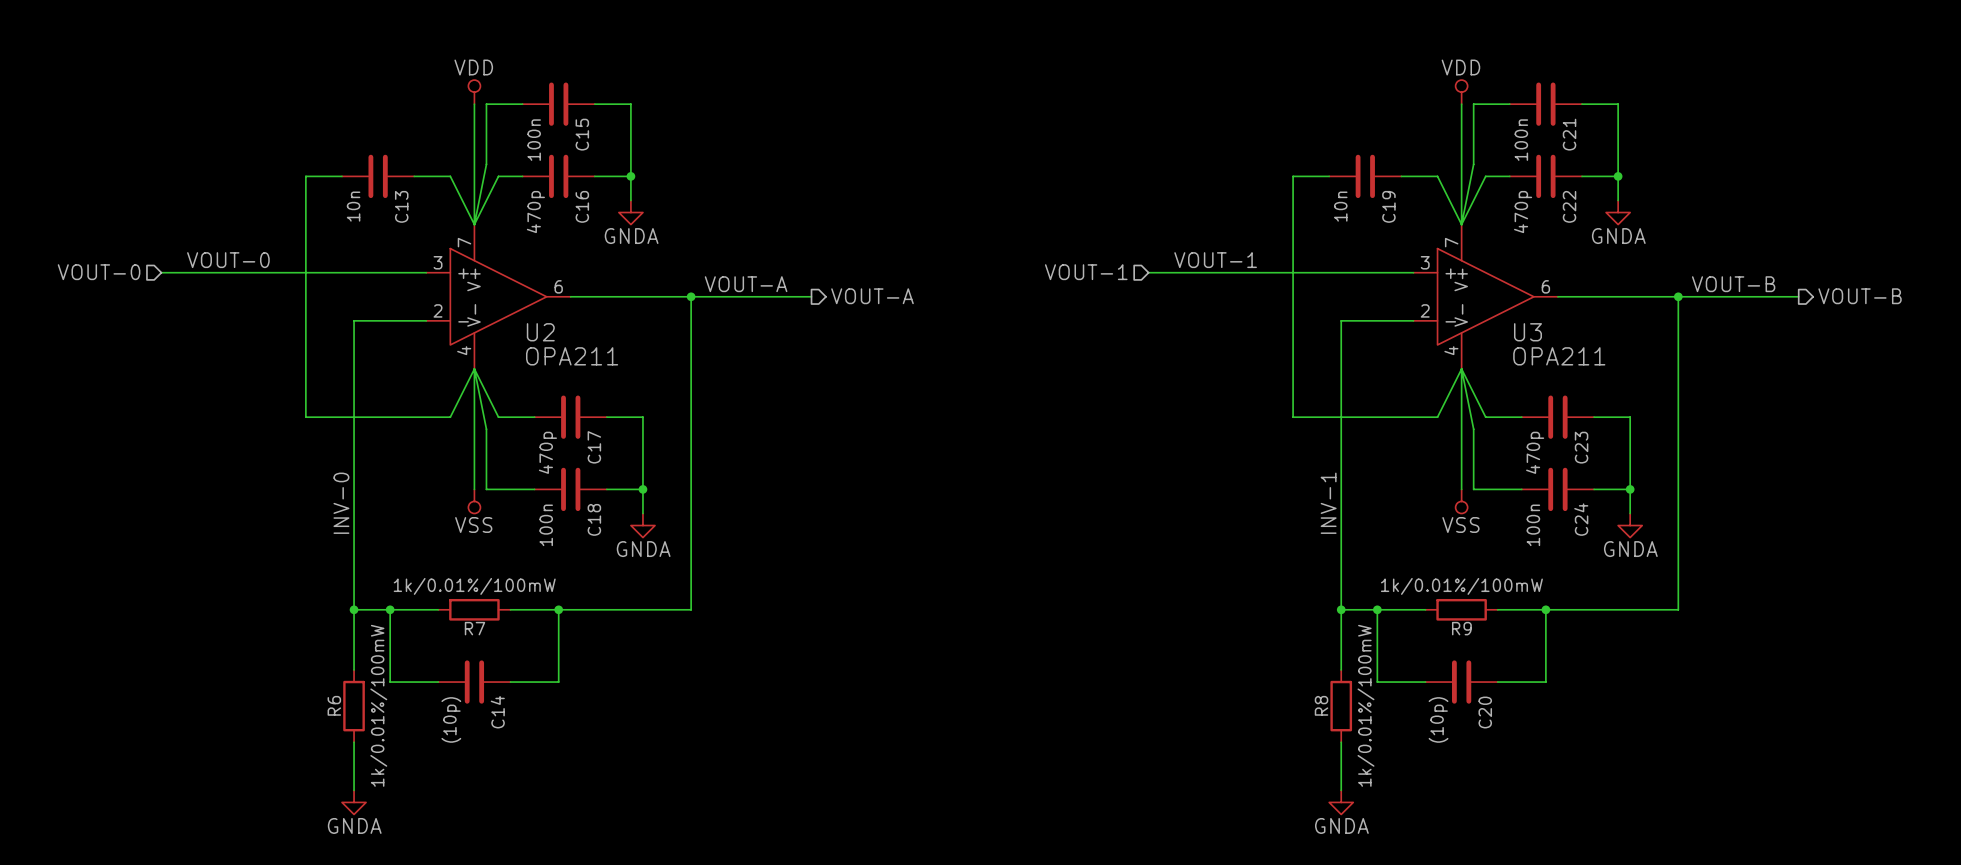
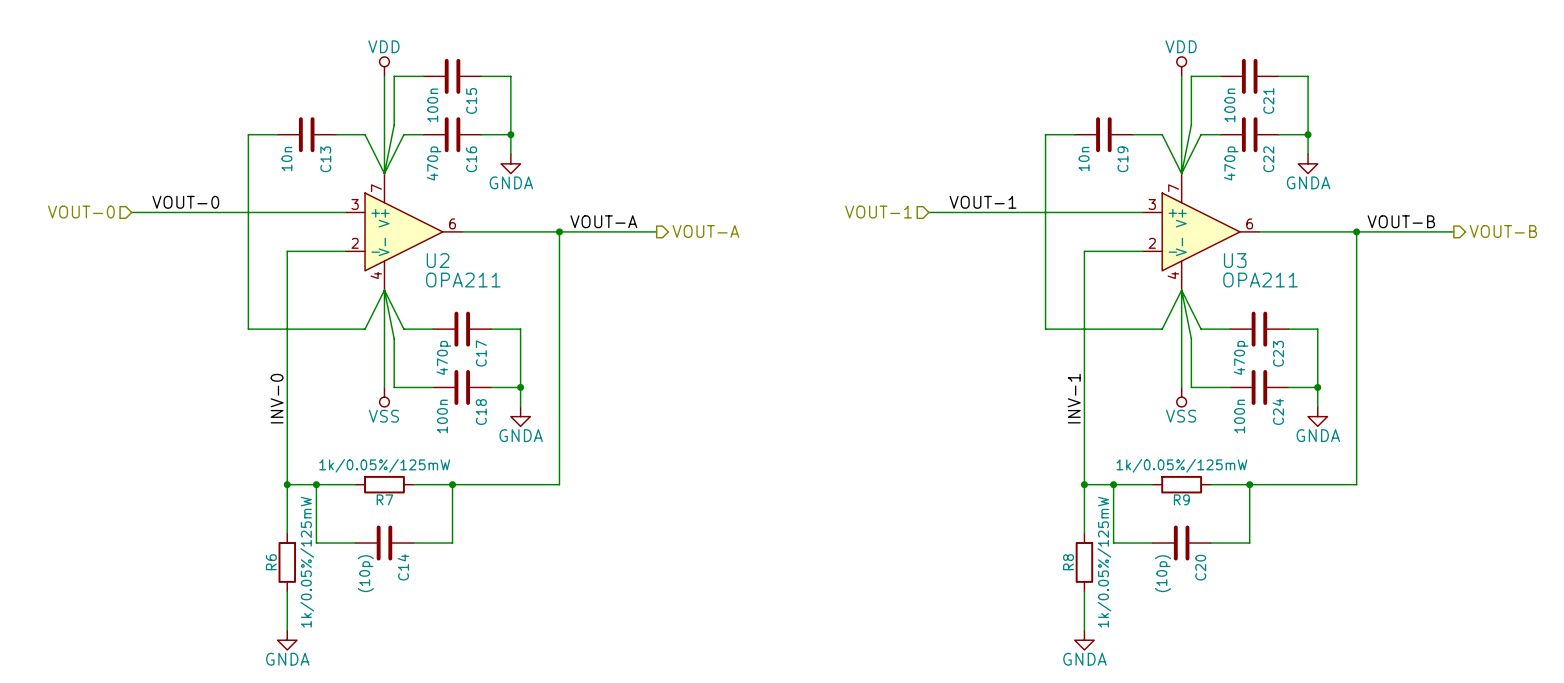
R7 value: 1k/0.01%/100mW (474, 586) -> 1k/0.05%/125mW (384, 465)
R9 value: 1k/0.01%/100mW (1461, 586) -> 1k/0.05%/125mW (1181, 465)
R6 value: 1k/0.01%/100mW (378, 705) -> 1k/0.05%/125mW (307, 562)
R8 value: 1k/0.01%/100mW (1366, 705) -> 1k/0.05%/125mW (1104, 562)

